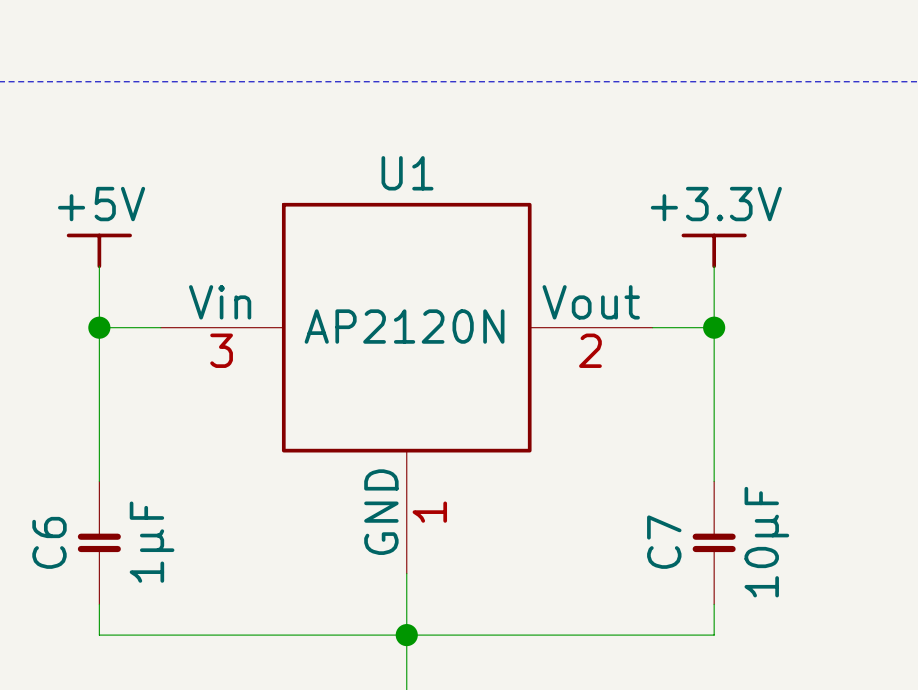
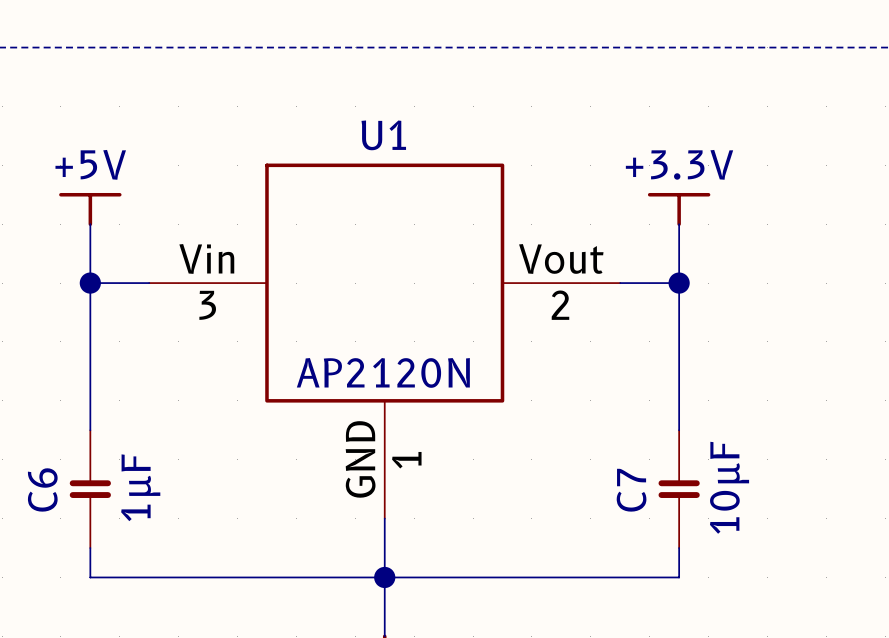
U1 value position: AP2120N (404, 326) -> AP2120N (383, 372)

